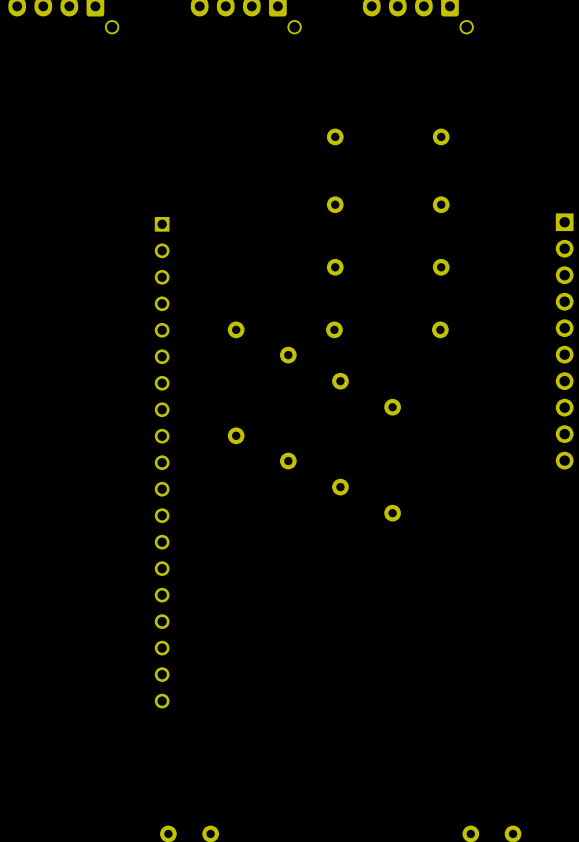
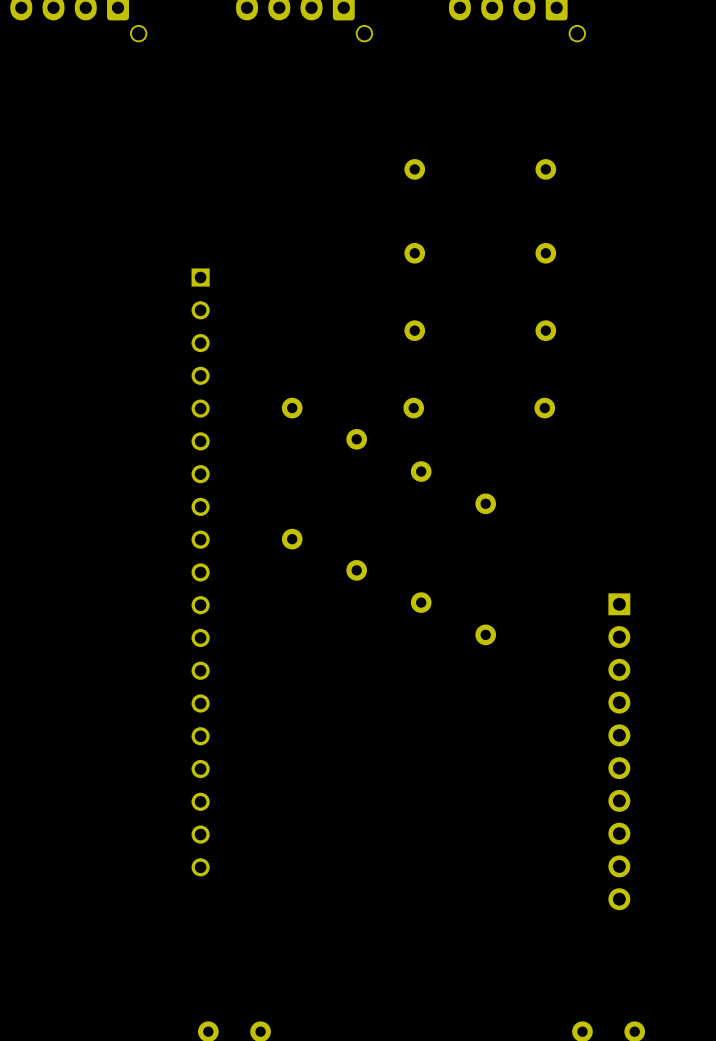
part: (564, 341) -> none
part: none -> (619, 751)

